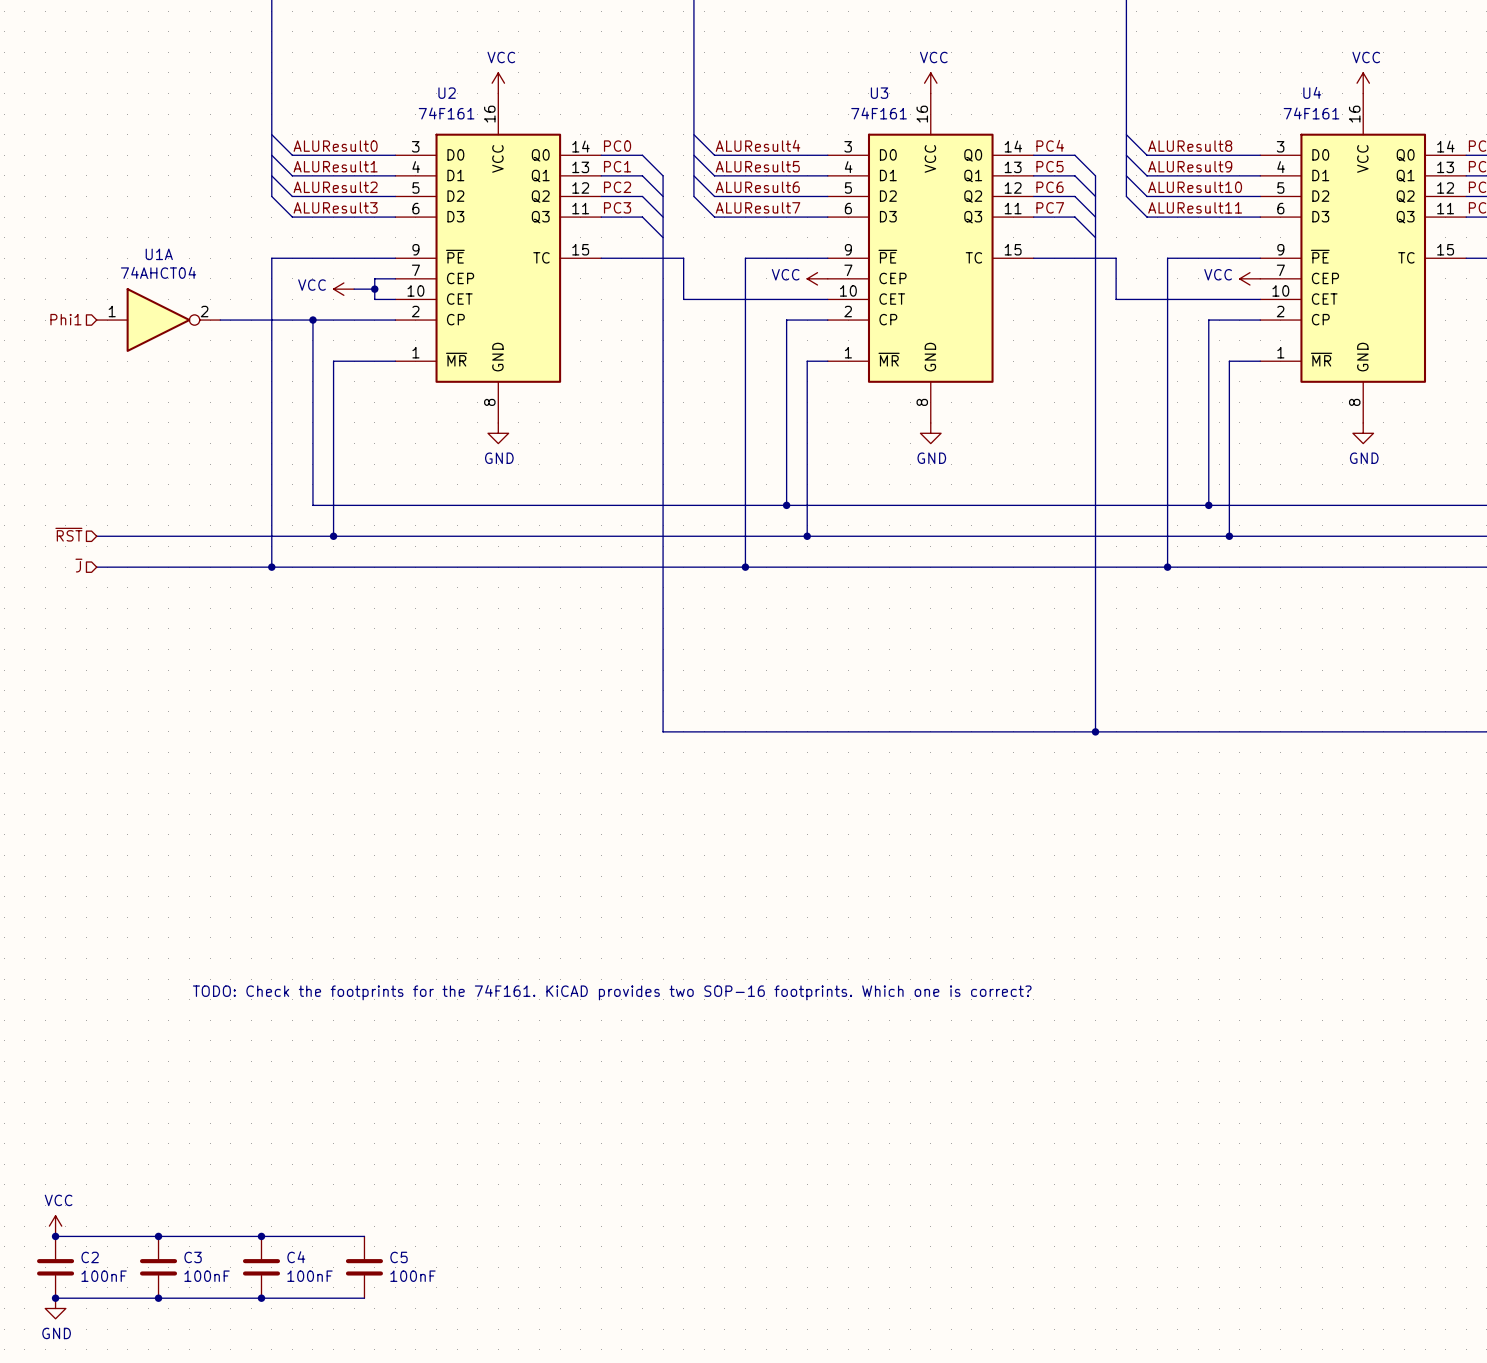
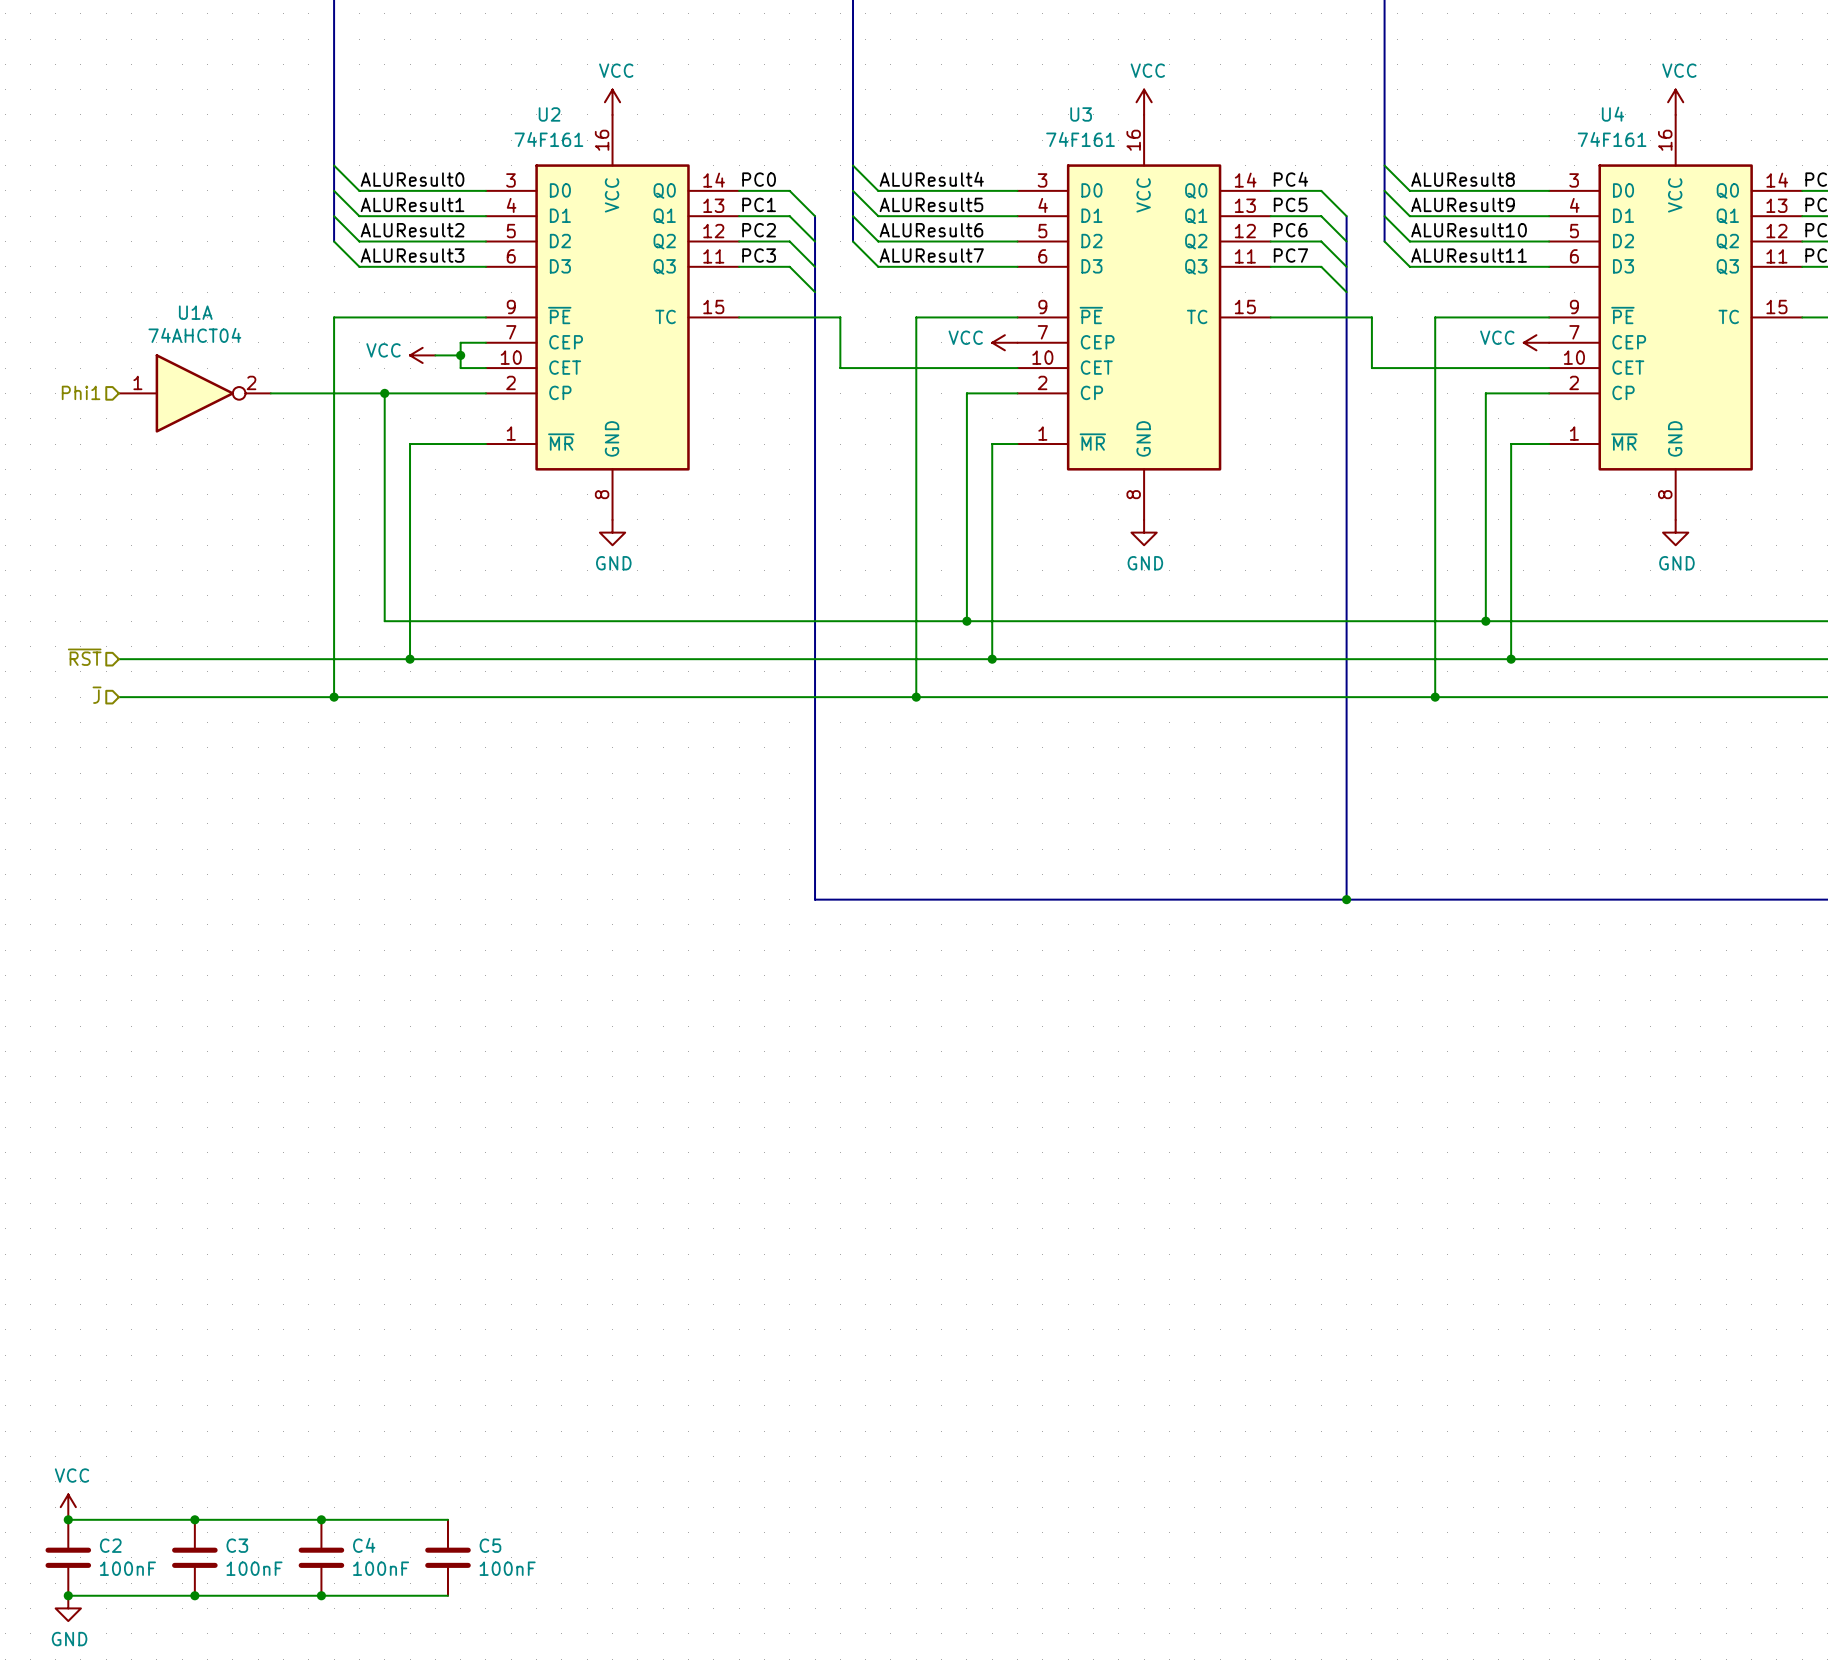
text: TODO: Check the footprints for the 74F161. KiCAD provides two SOP-16 footprints. Which one is correct? (612, 992) -> none

